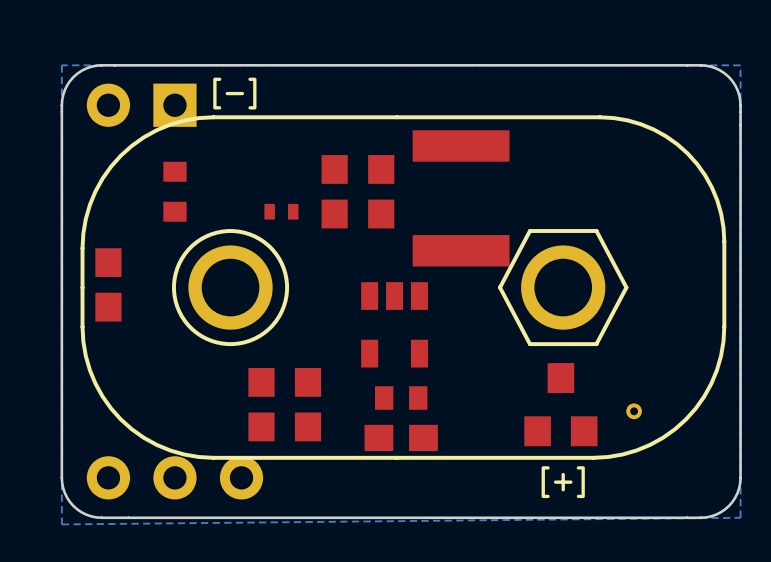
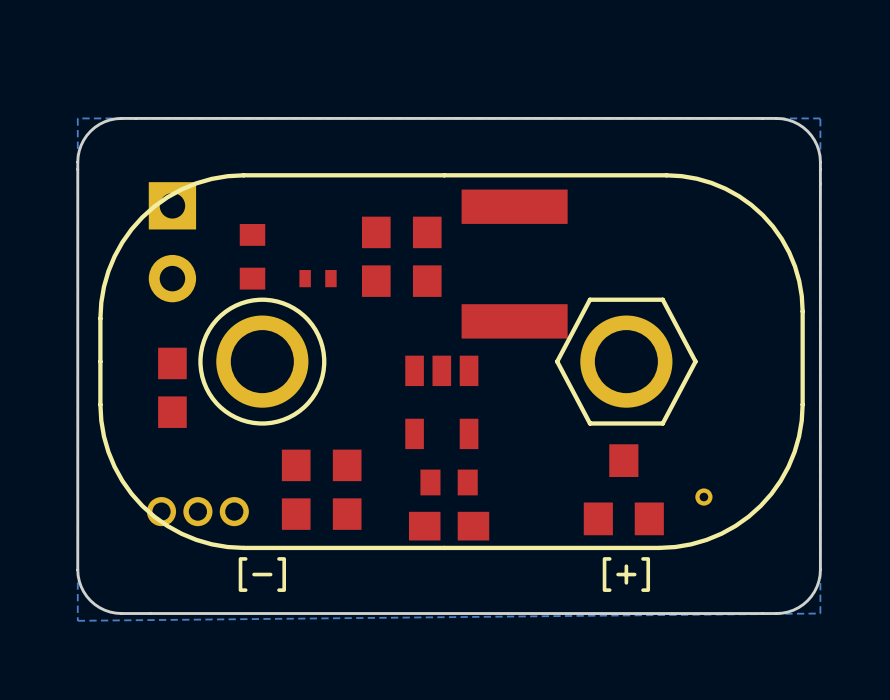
part text position: [-] (234, 93) -> [-] (262, 574)
part rotation: 0° (141, 105) -> 90° counterclockwise (172, 242)
part position: (141, 105) -> (172, 242)
part position: (174, 191) -> (252, 256)
part position: (108, 284) -> (172, 387)
part: none -> (197, 511)
part: (174, 477) -> none

